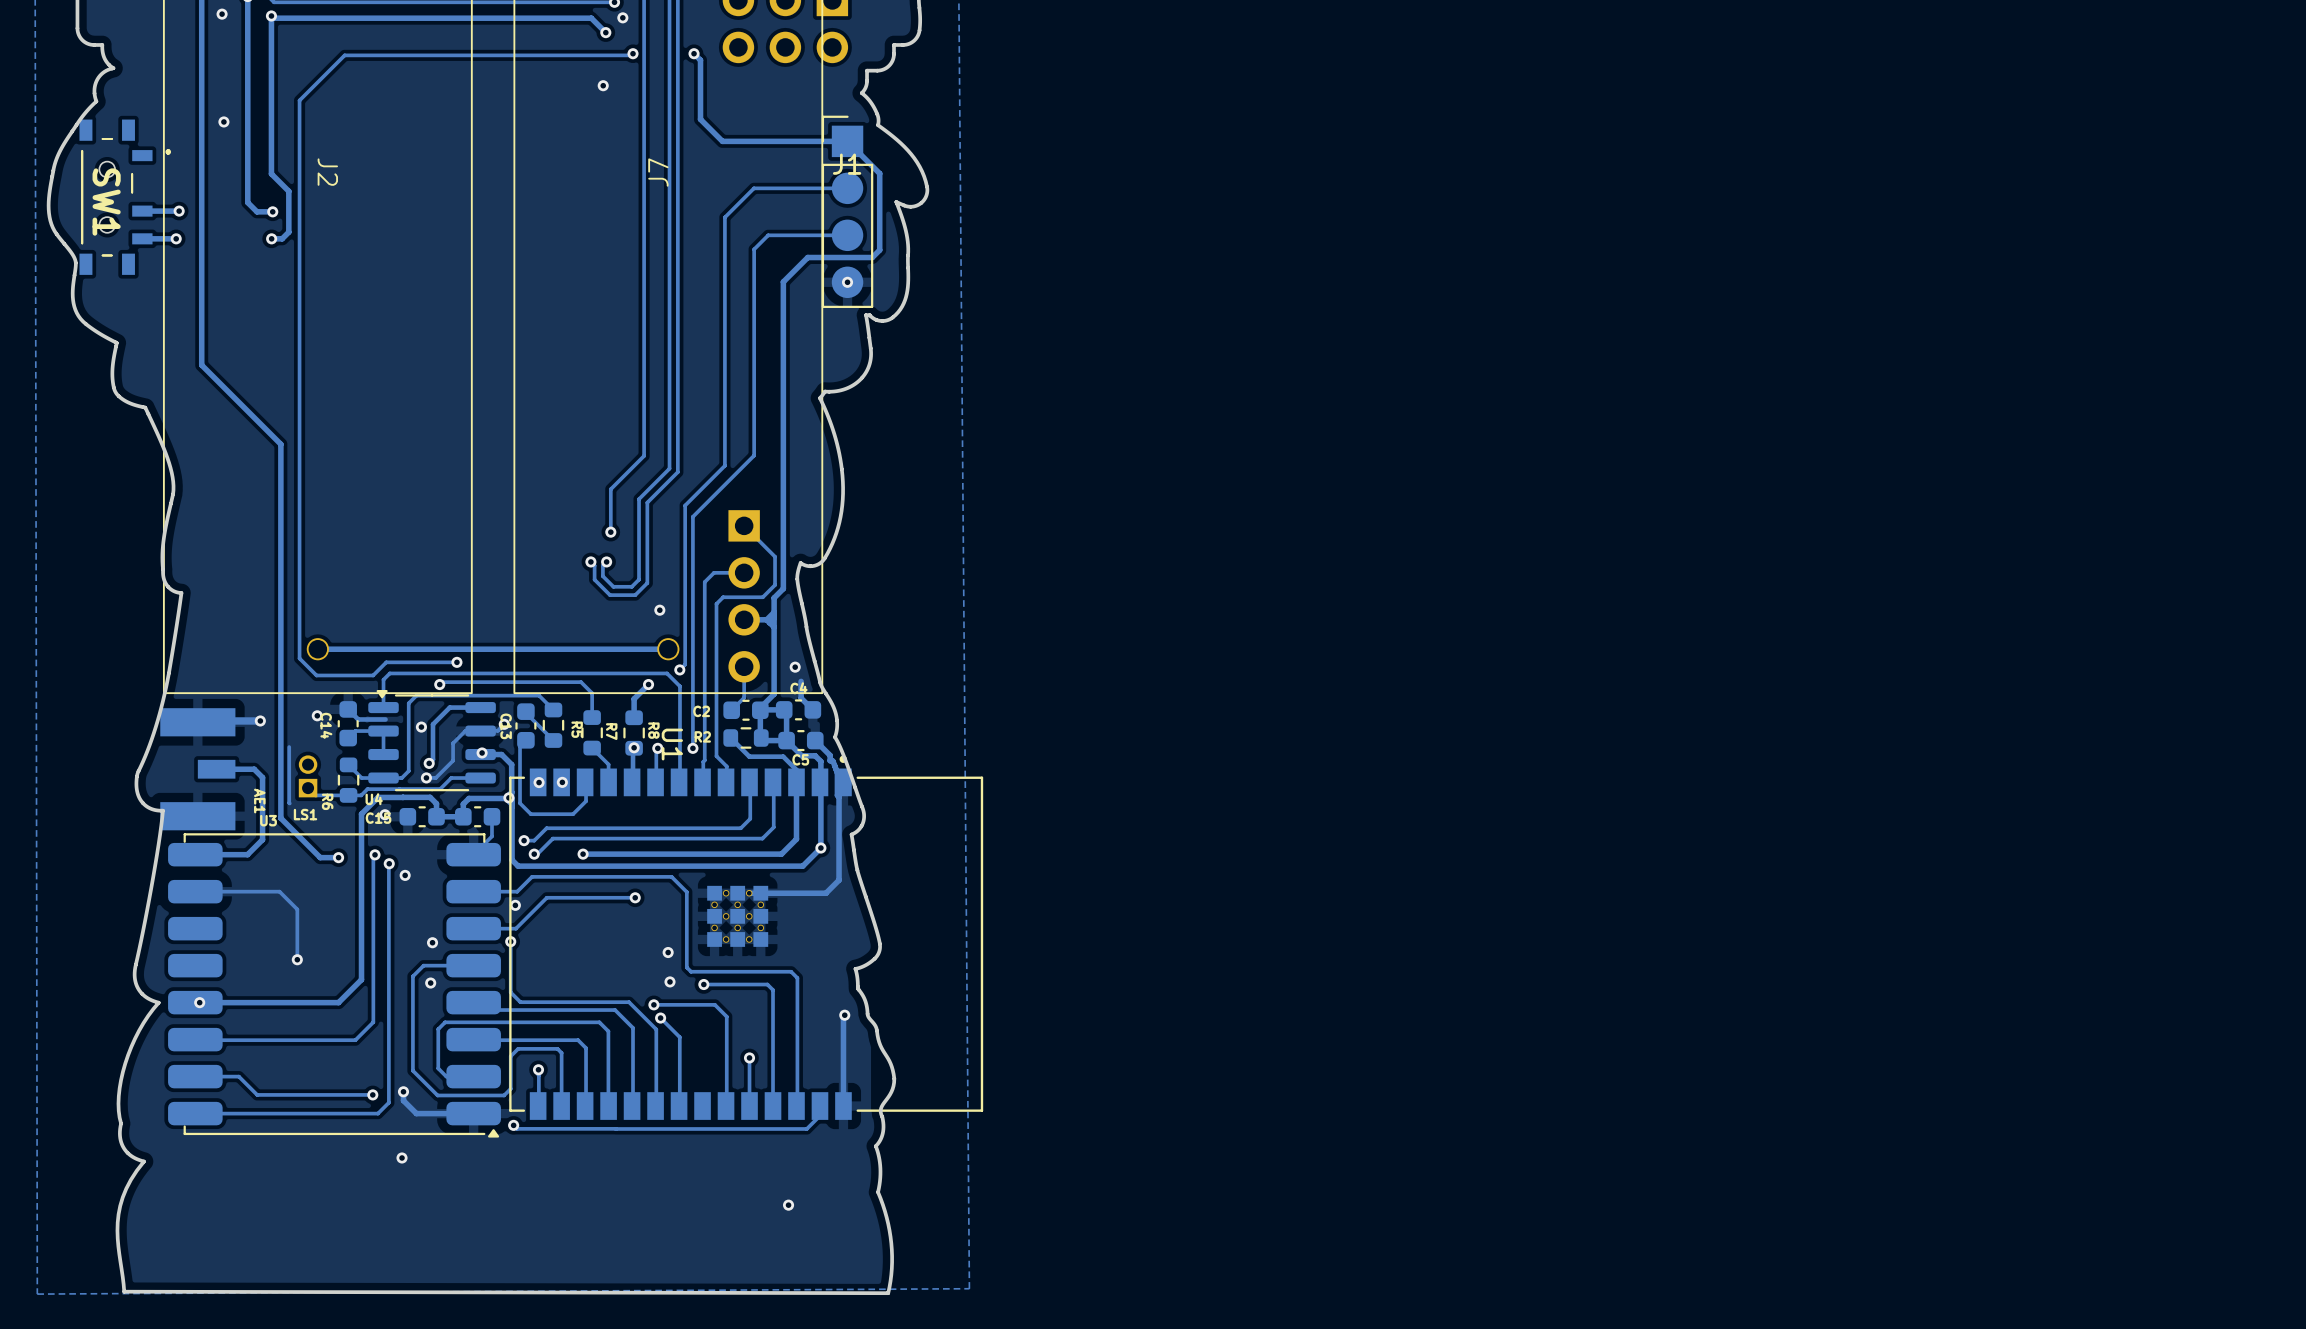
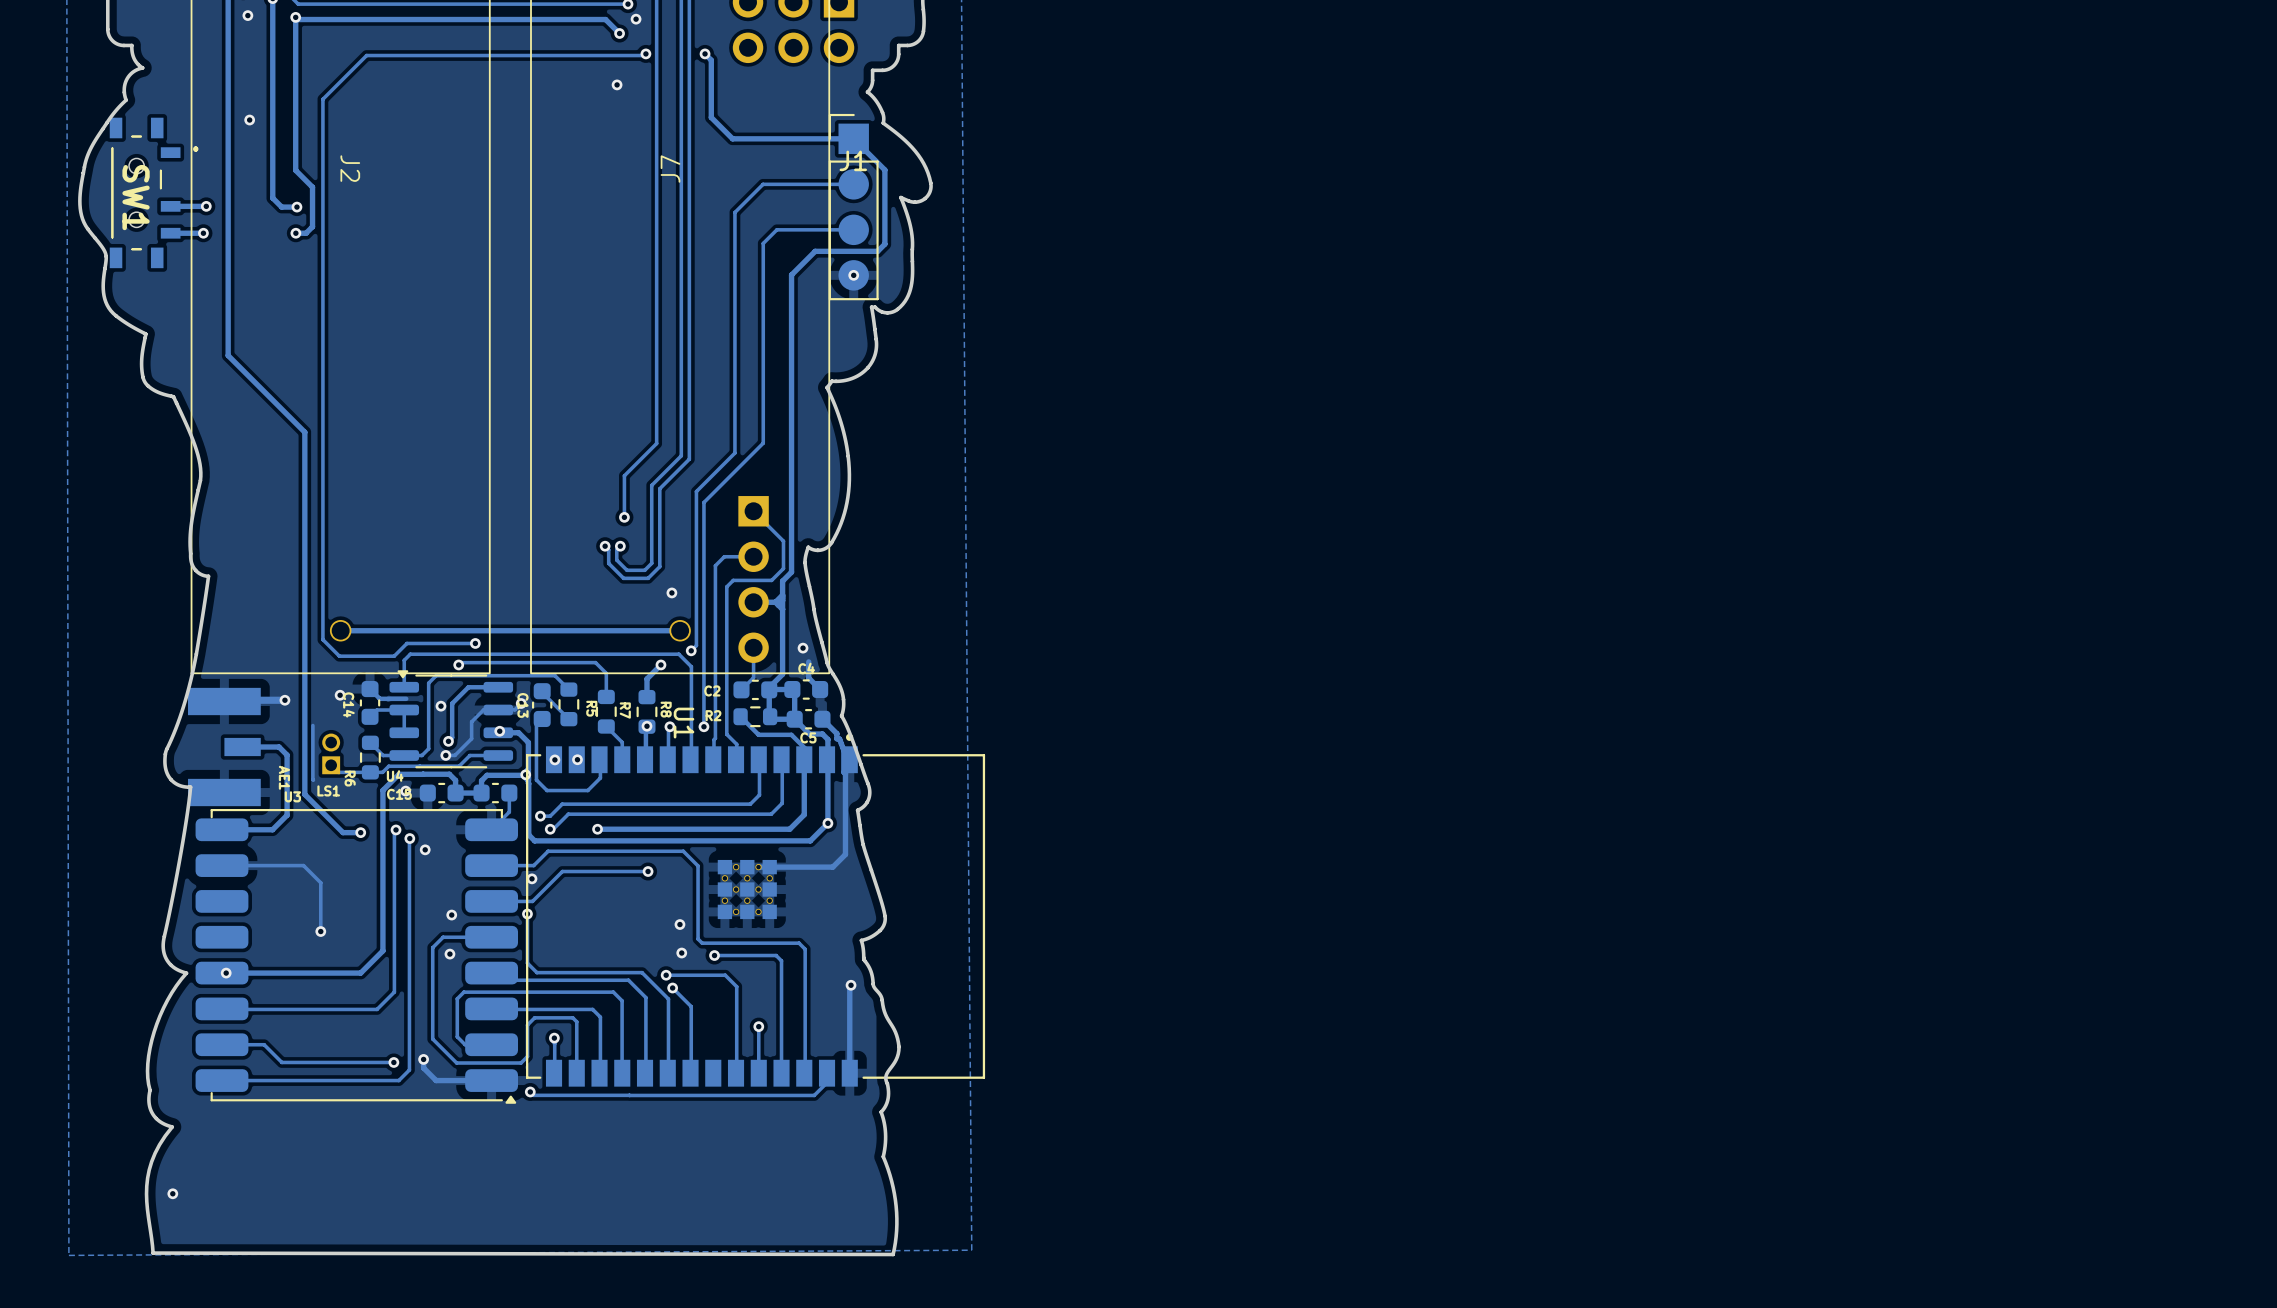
via: (402, 1157) -> none
via: (788, 1205) -> none
via: none -> (172, 1193)

